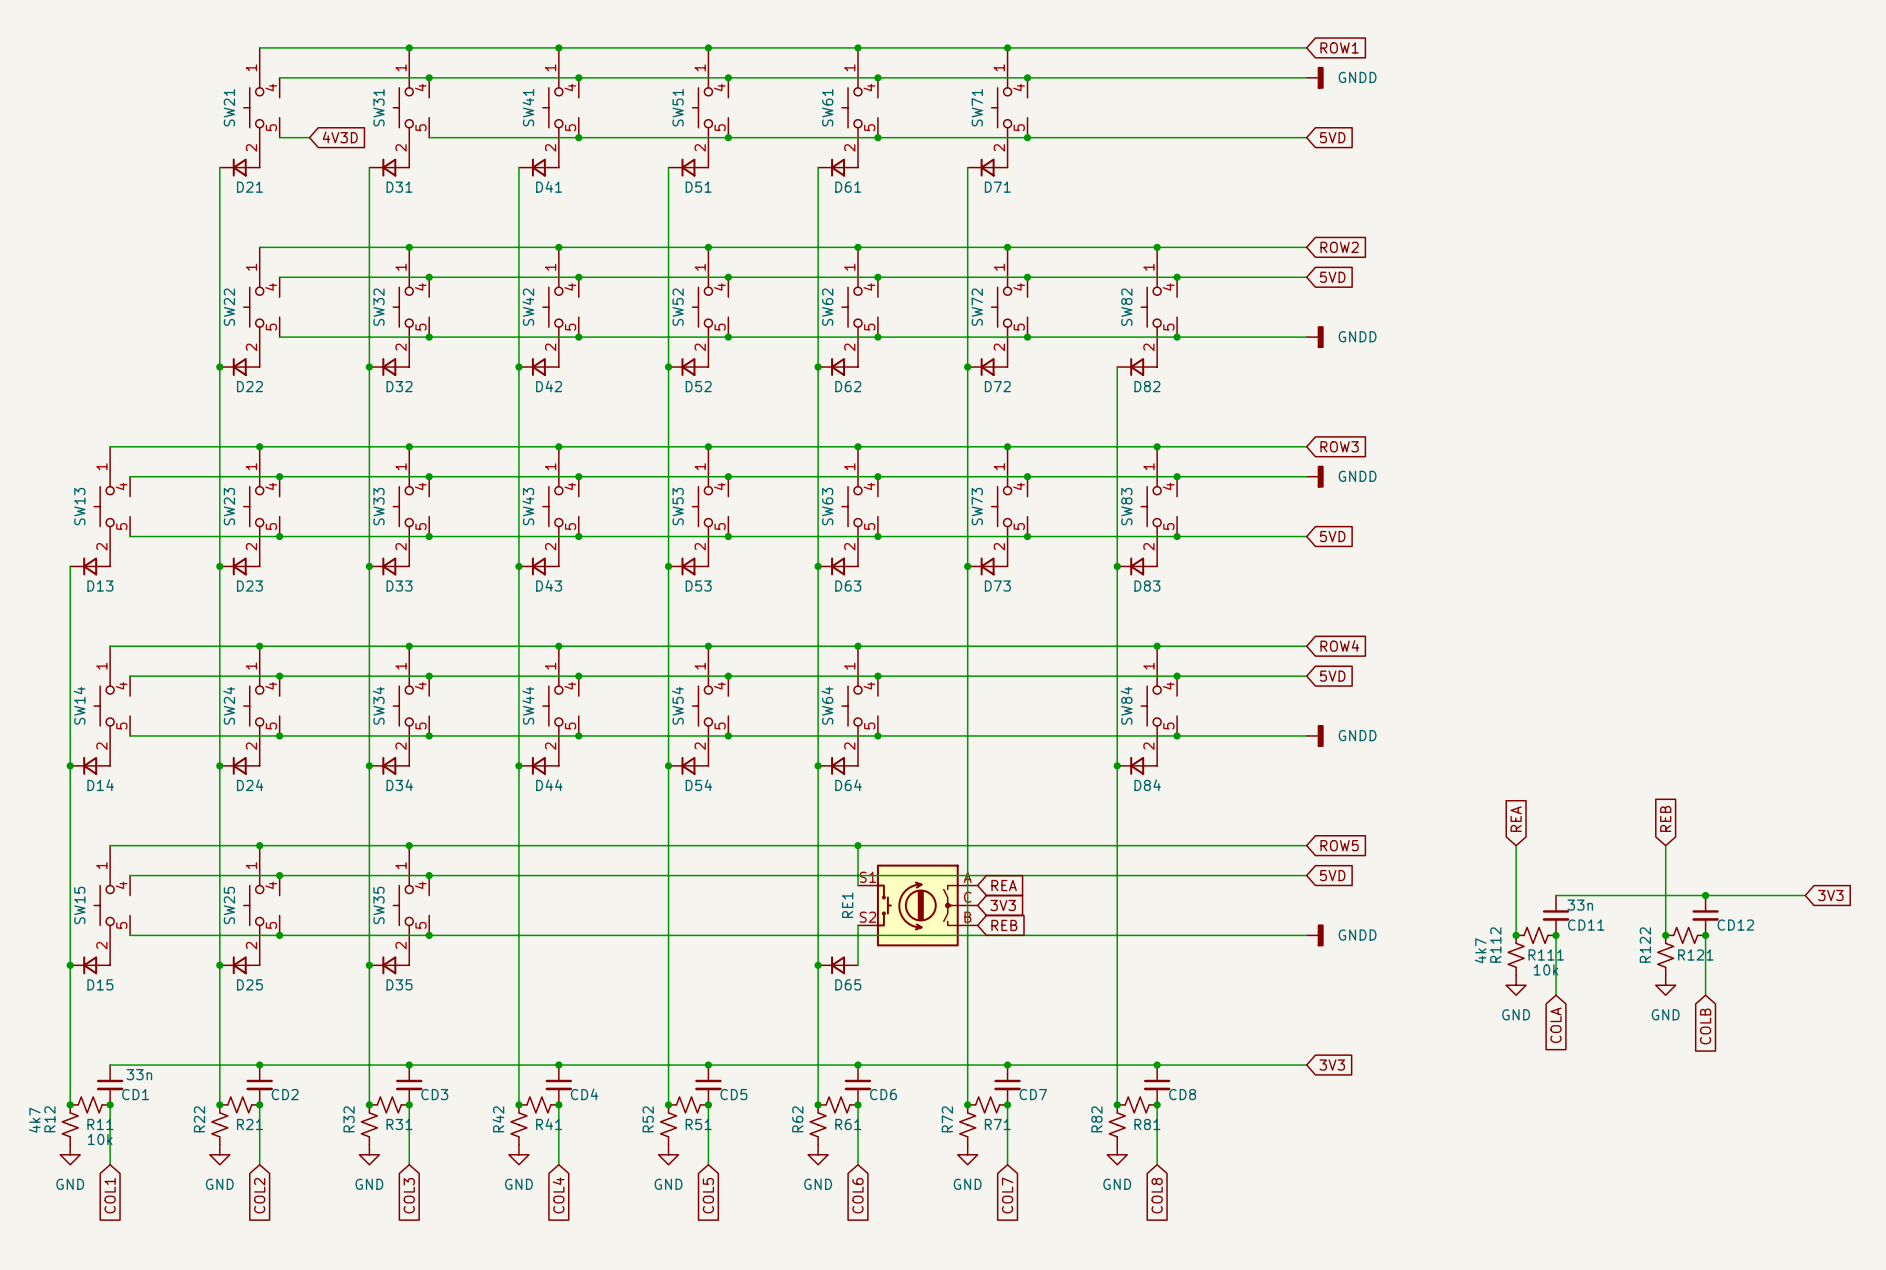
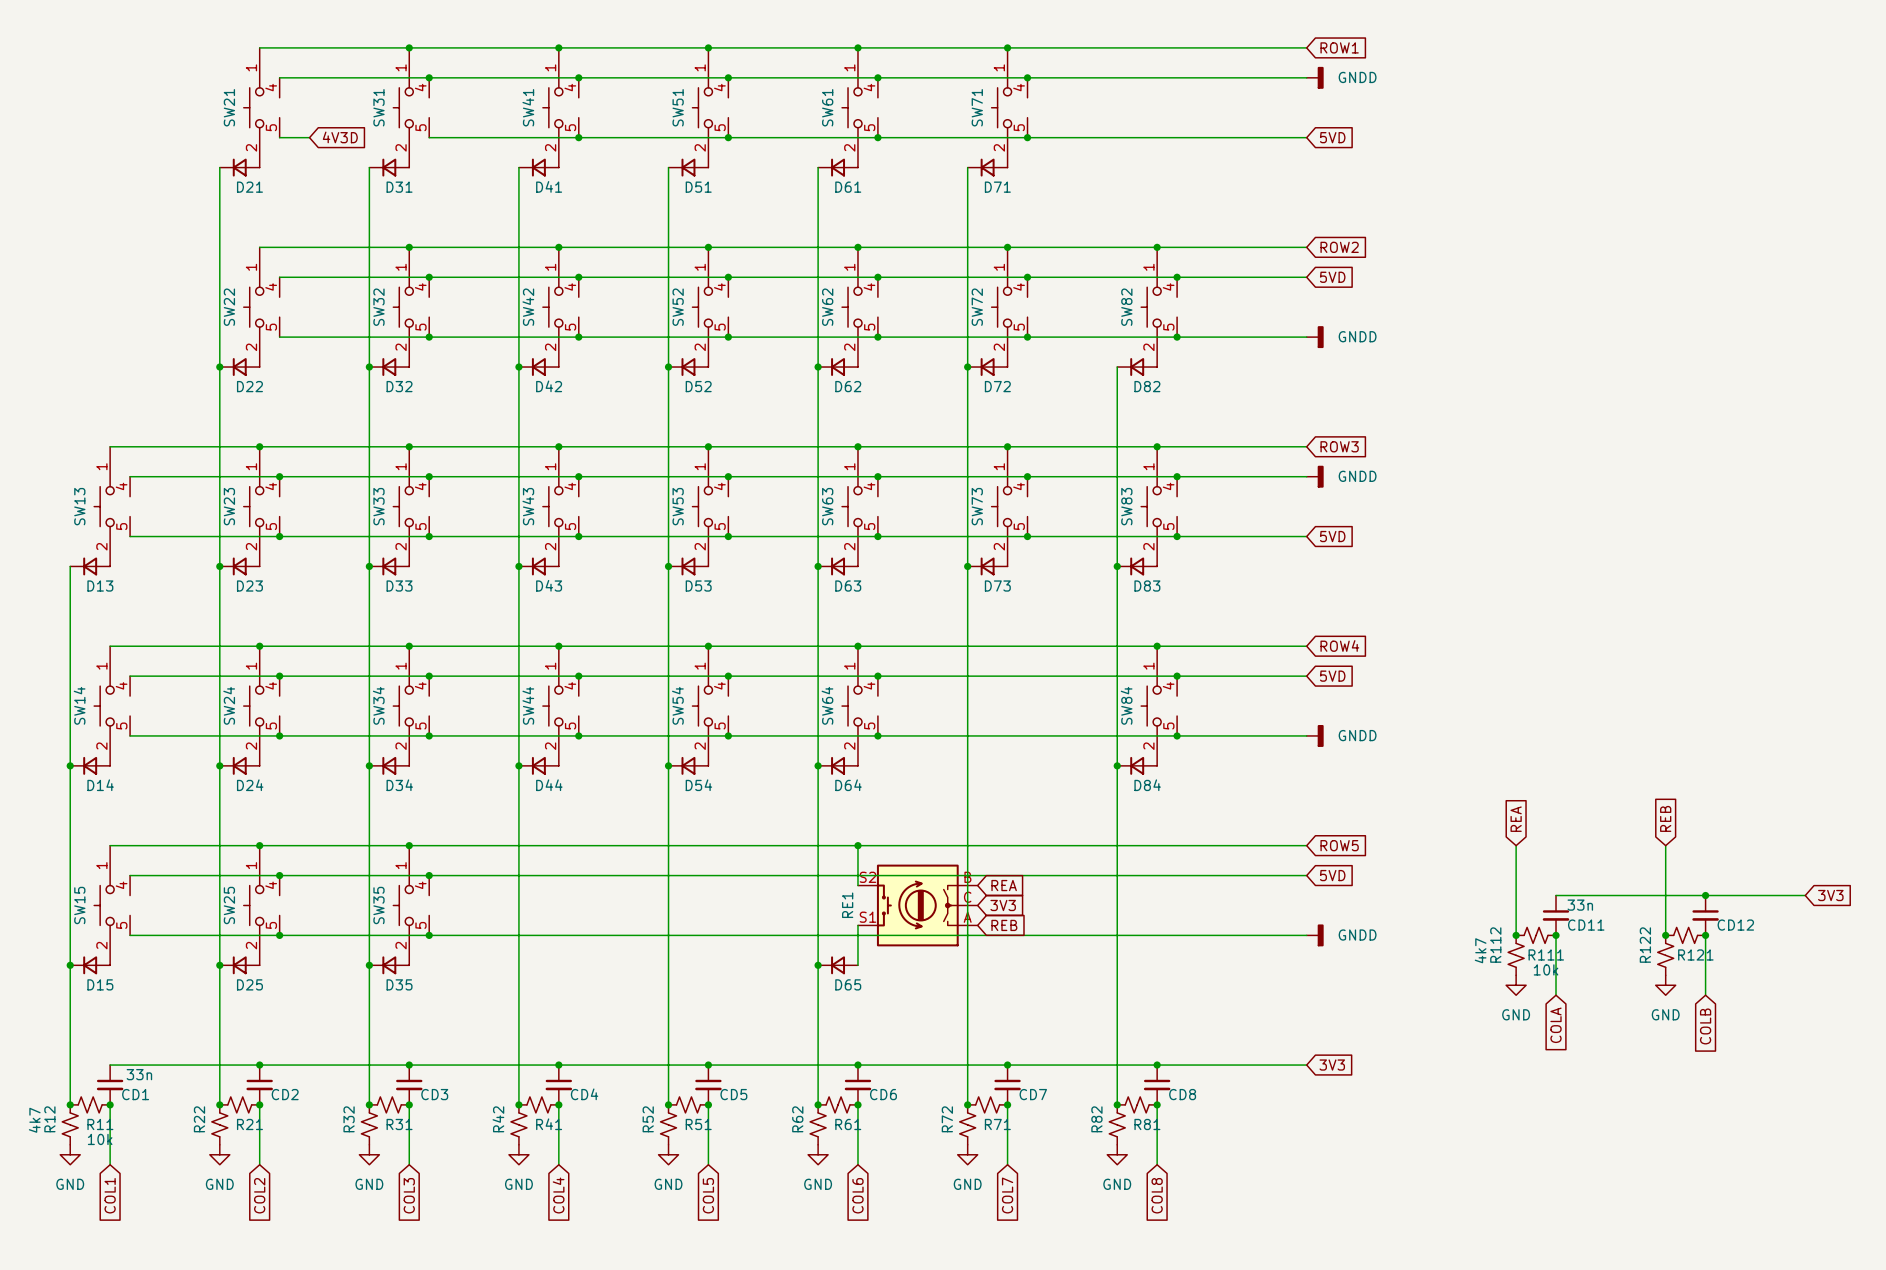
RE1 flip: as is (917, 905) -> up-down (917, 905)

